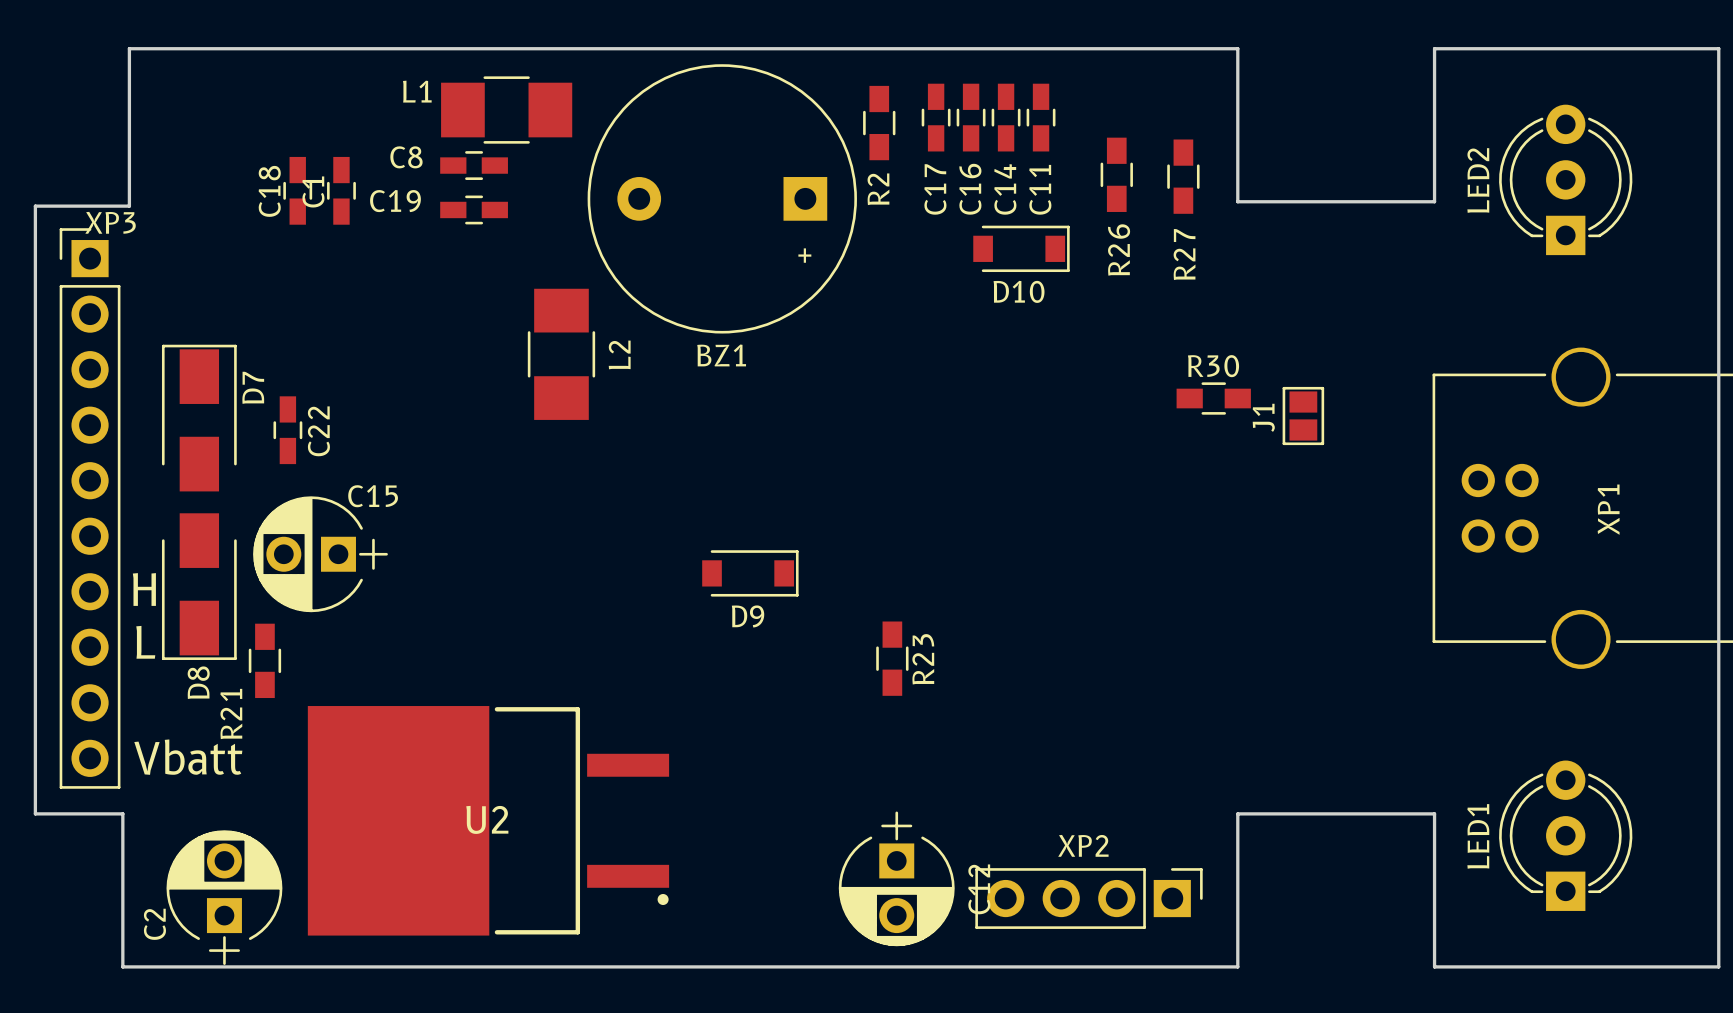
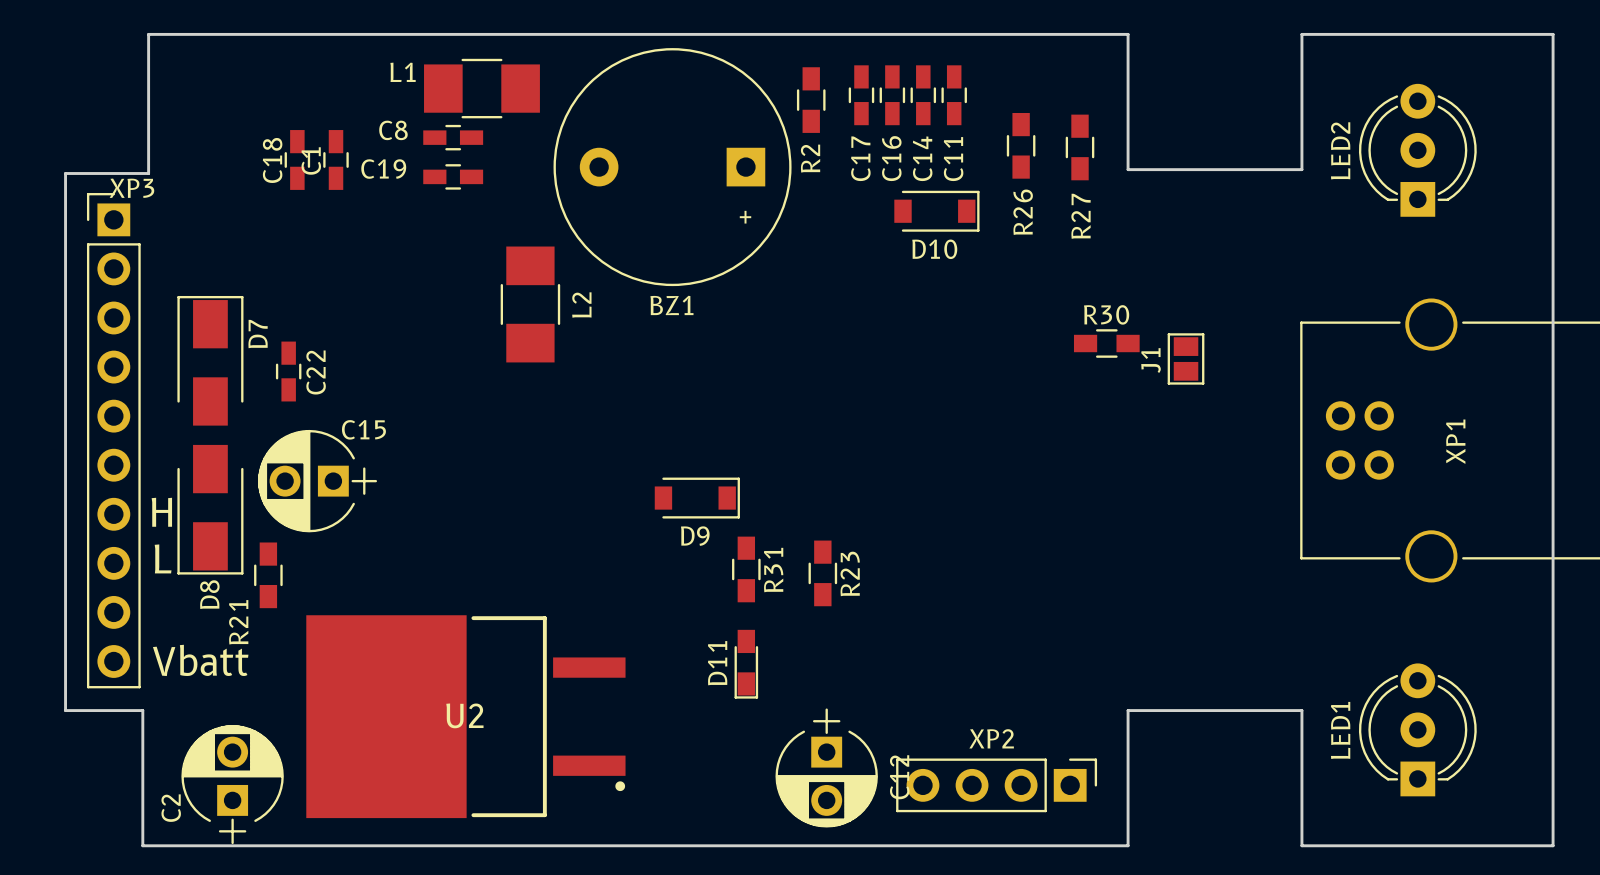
R31: none -> (746, 569)
D11: none -> (746, 664)

